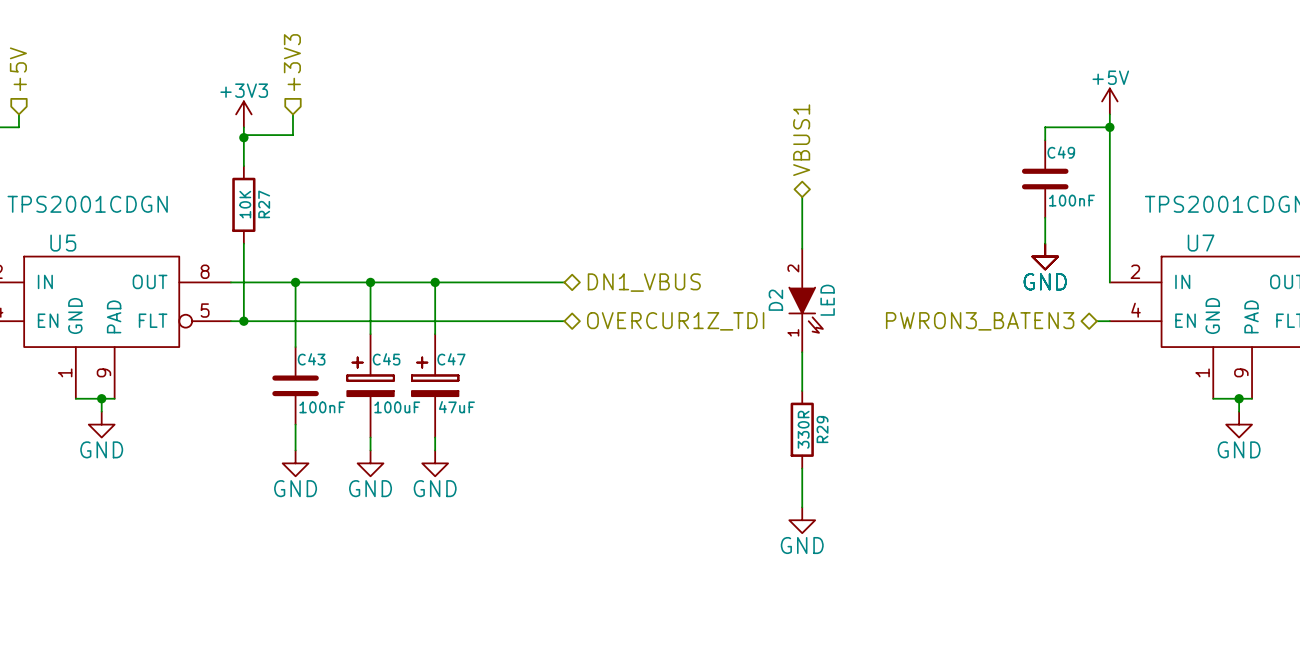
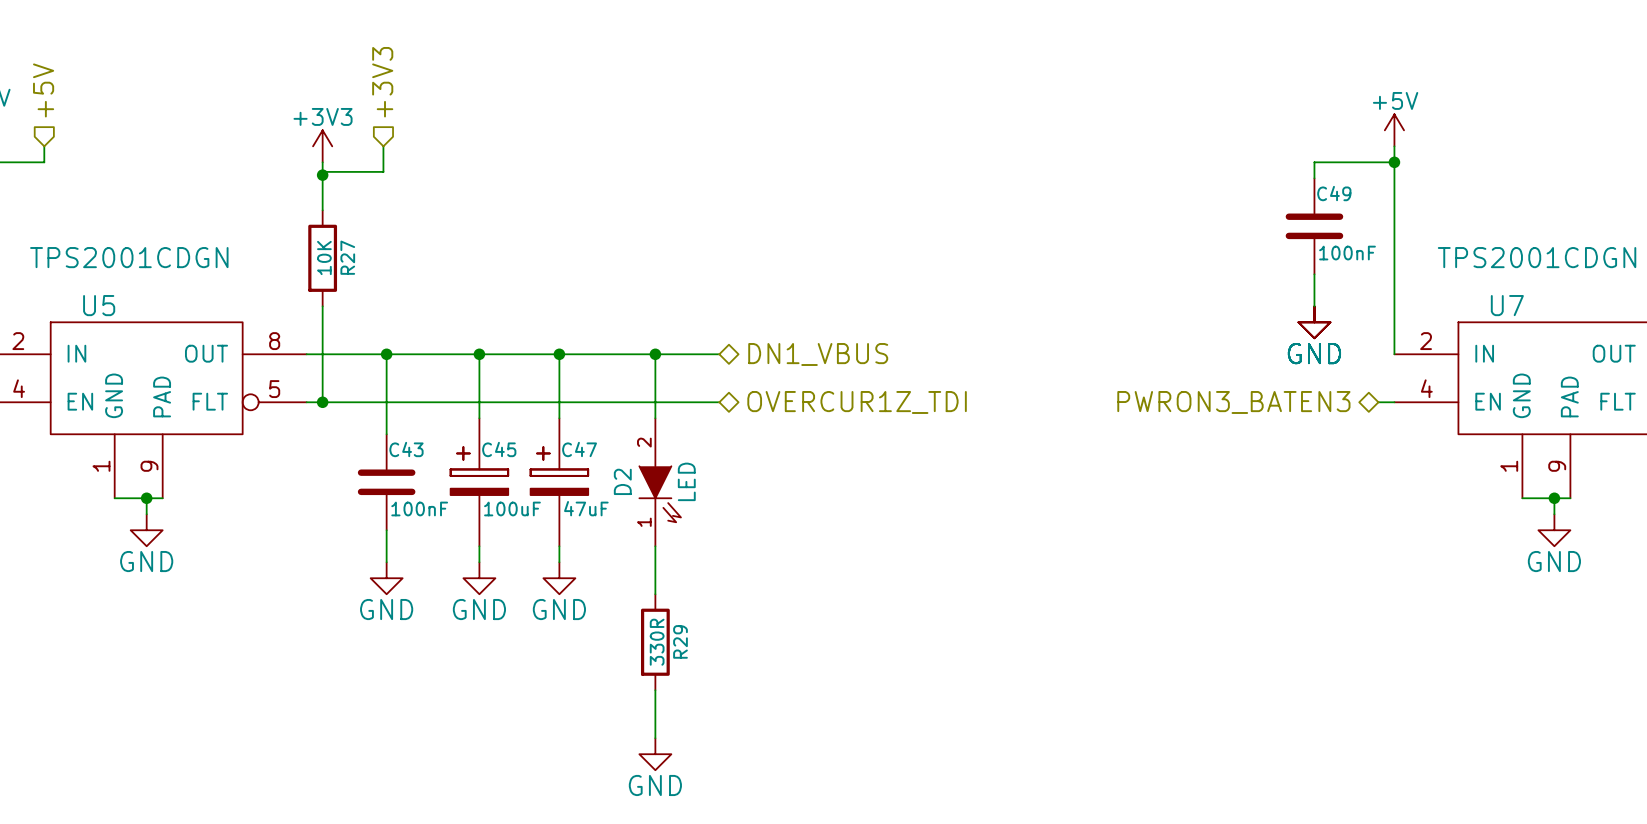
hierarchical label: VBUS1 (801, 140) -> none
wire: (802, 197) (802, 248) -> none
wire: none -> (655, 354) (655, 418)
junction: none -> (655, 354)
D2 position: (806, 300) -> (660, 482)
wire: (802, 352) (802, 390) -> none
R29 position: (802, 429) -> (655, 642)
wire: none -> (655, 546) (655, 594)
wire: (802, 468) (802, 507) -> none
power symbol: GND (802, 520) -> none
wire: none -> (655, 690) (655, 738)
power symbol: none -> GND (655, 754)

